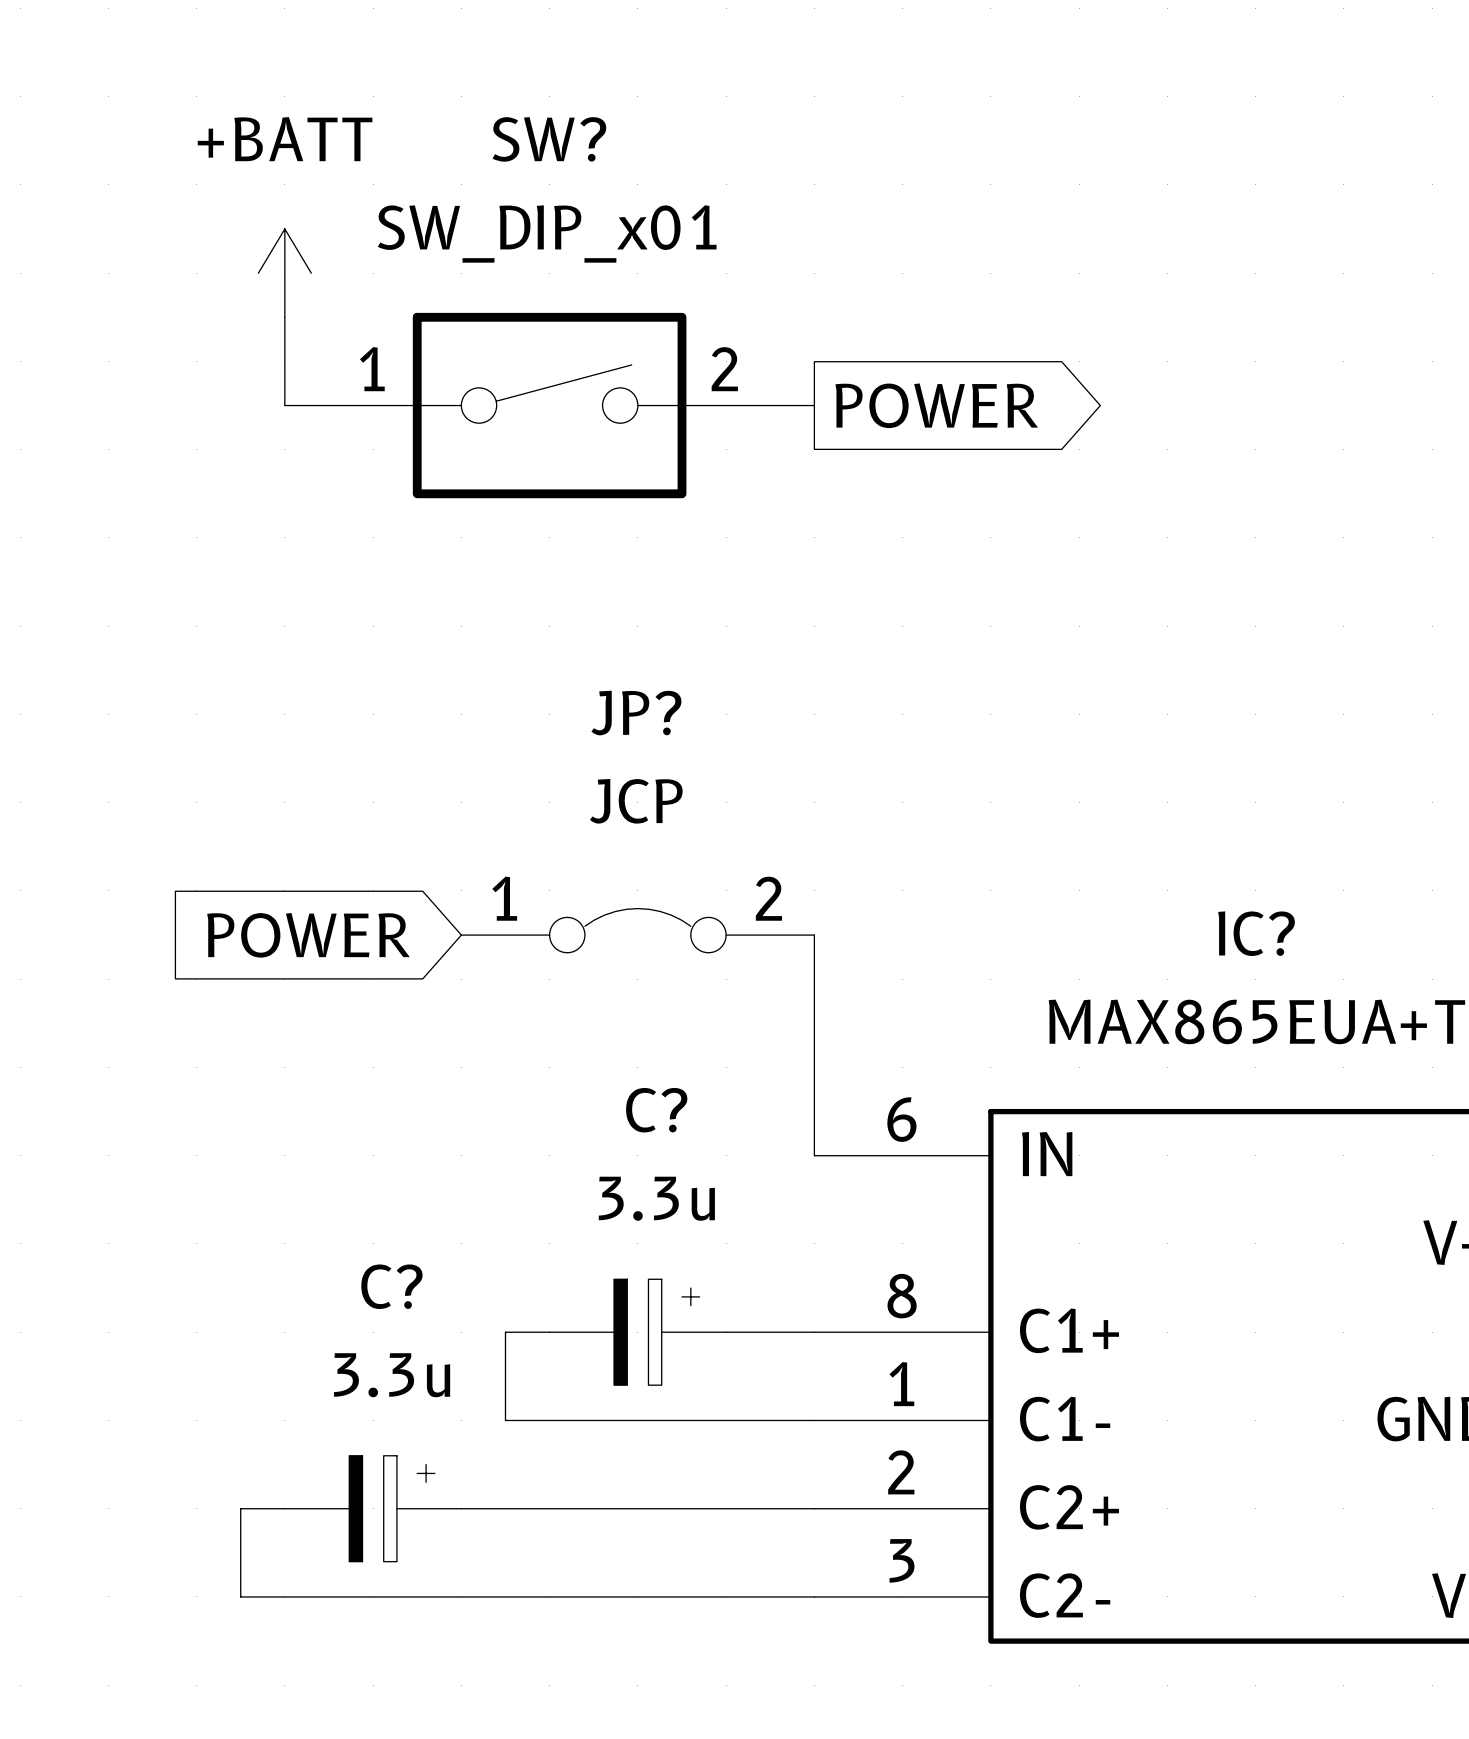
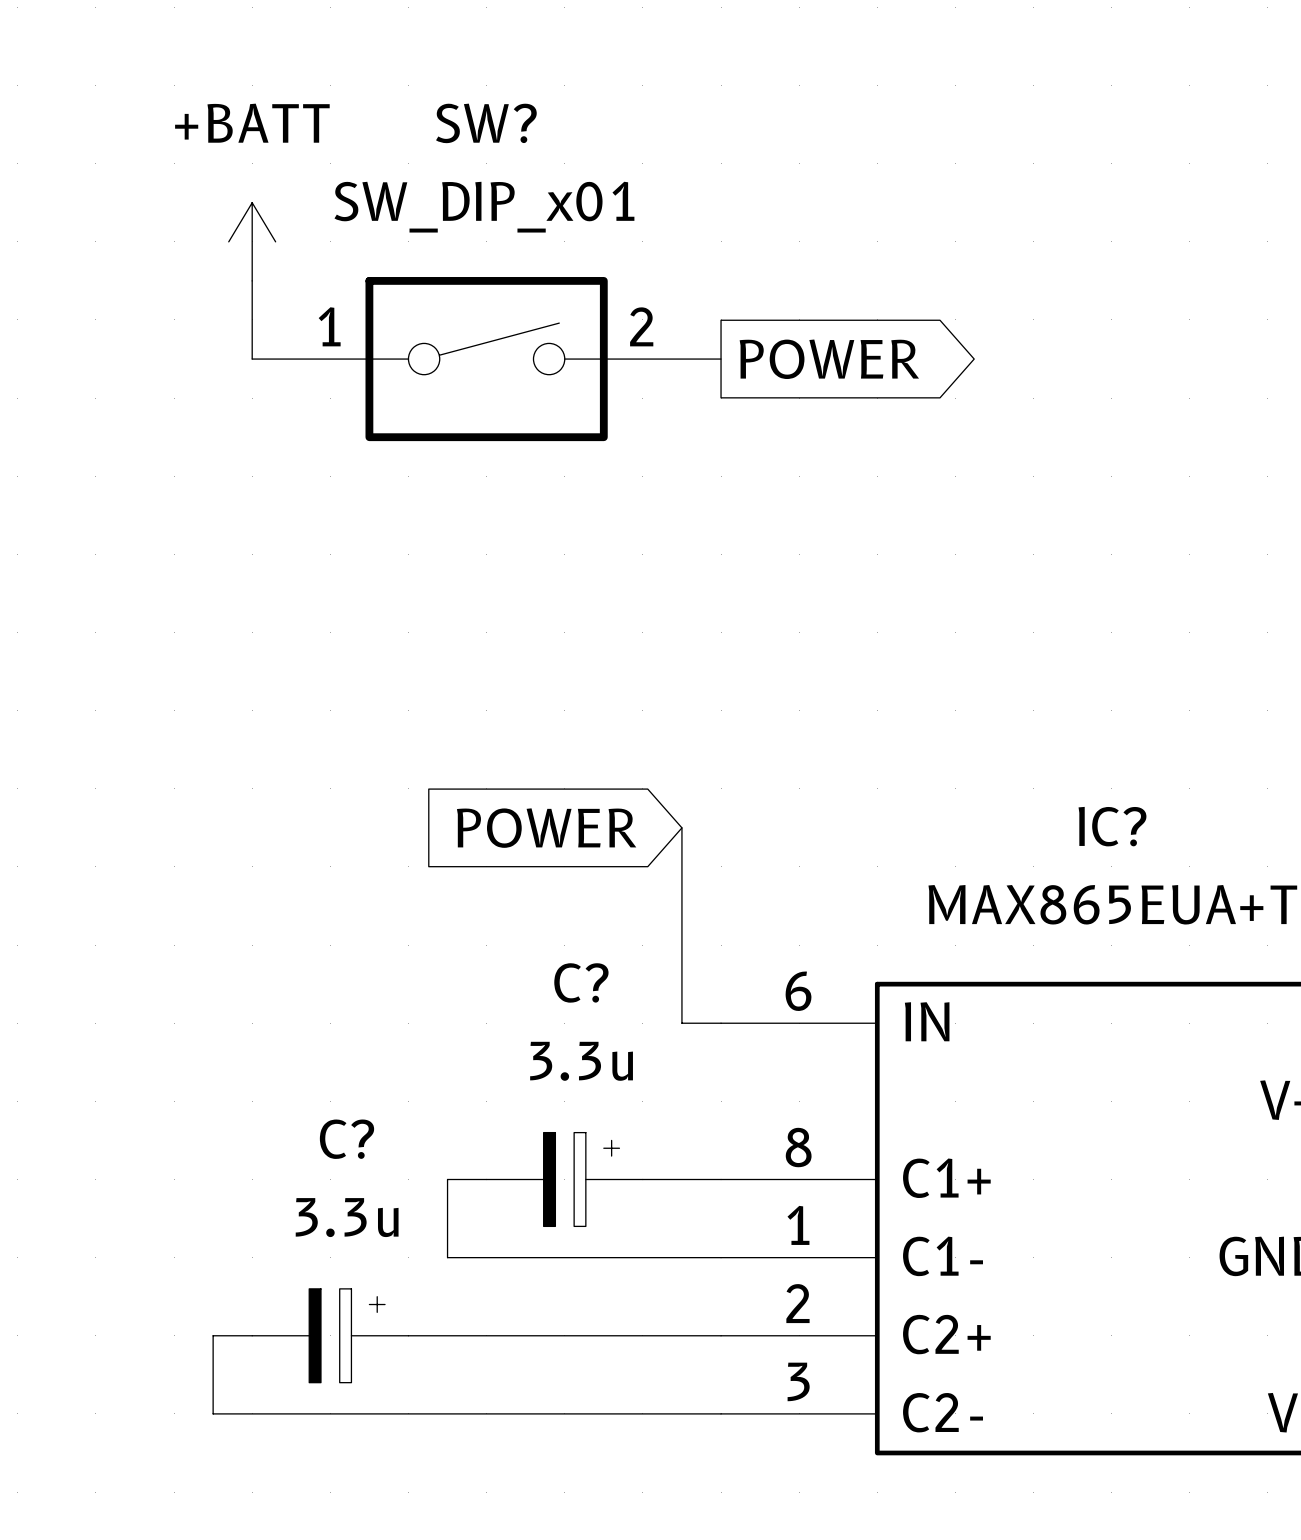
JP?: JCP (637, 930) -> none
global label position: POWER (308, 935) -> POWER (546, 828)
wire: (814, 935) (814, 1155) -> (681, 827) (681, 1023) (721, 1023)

